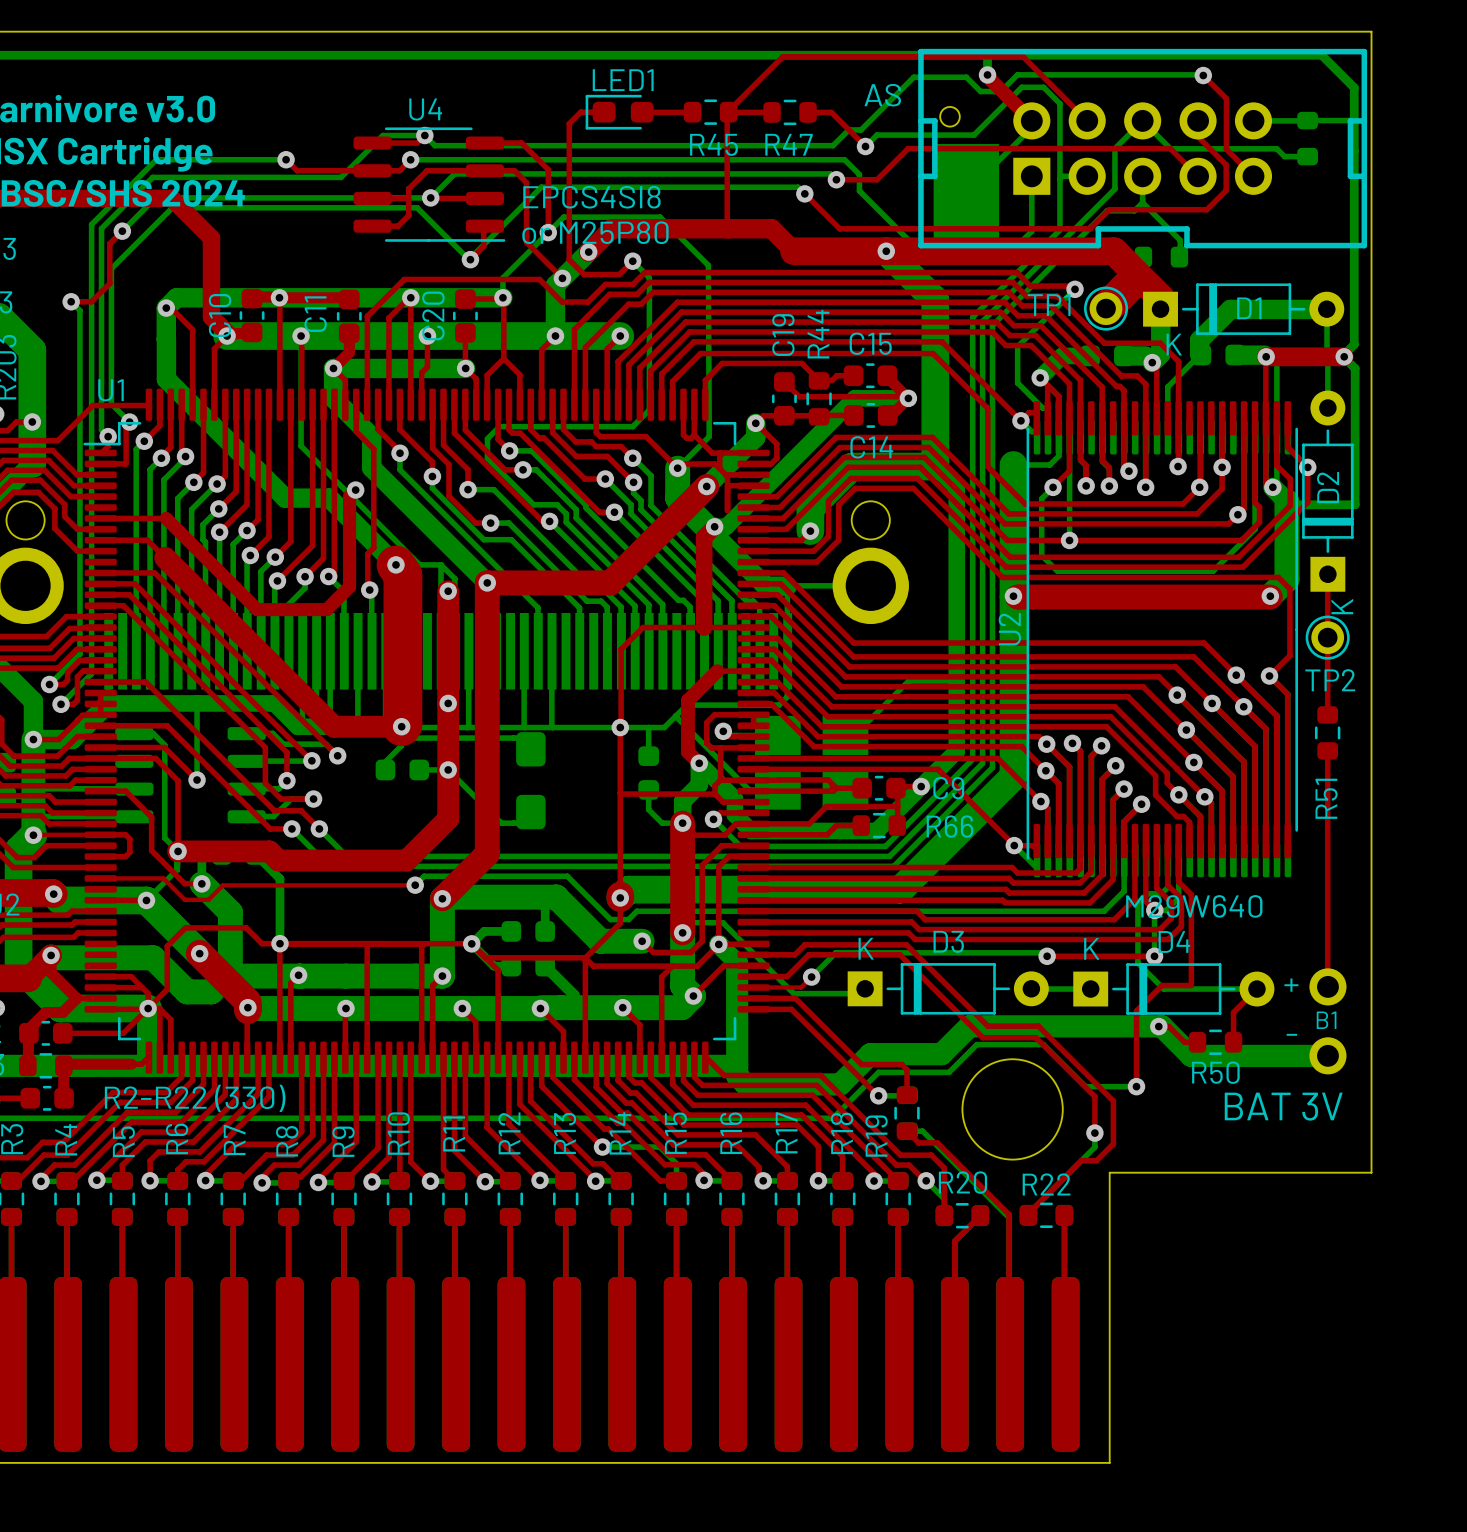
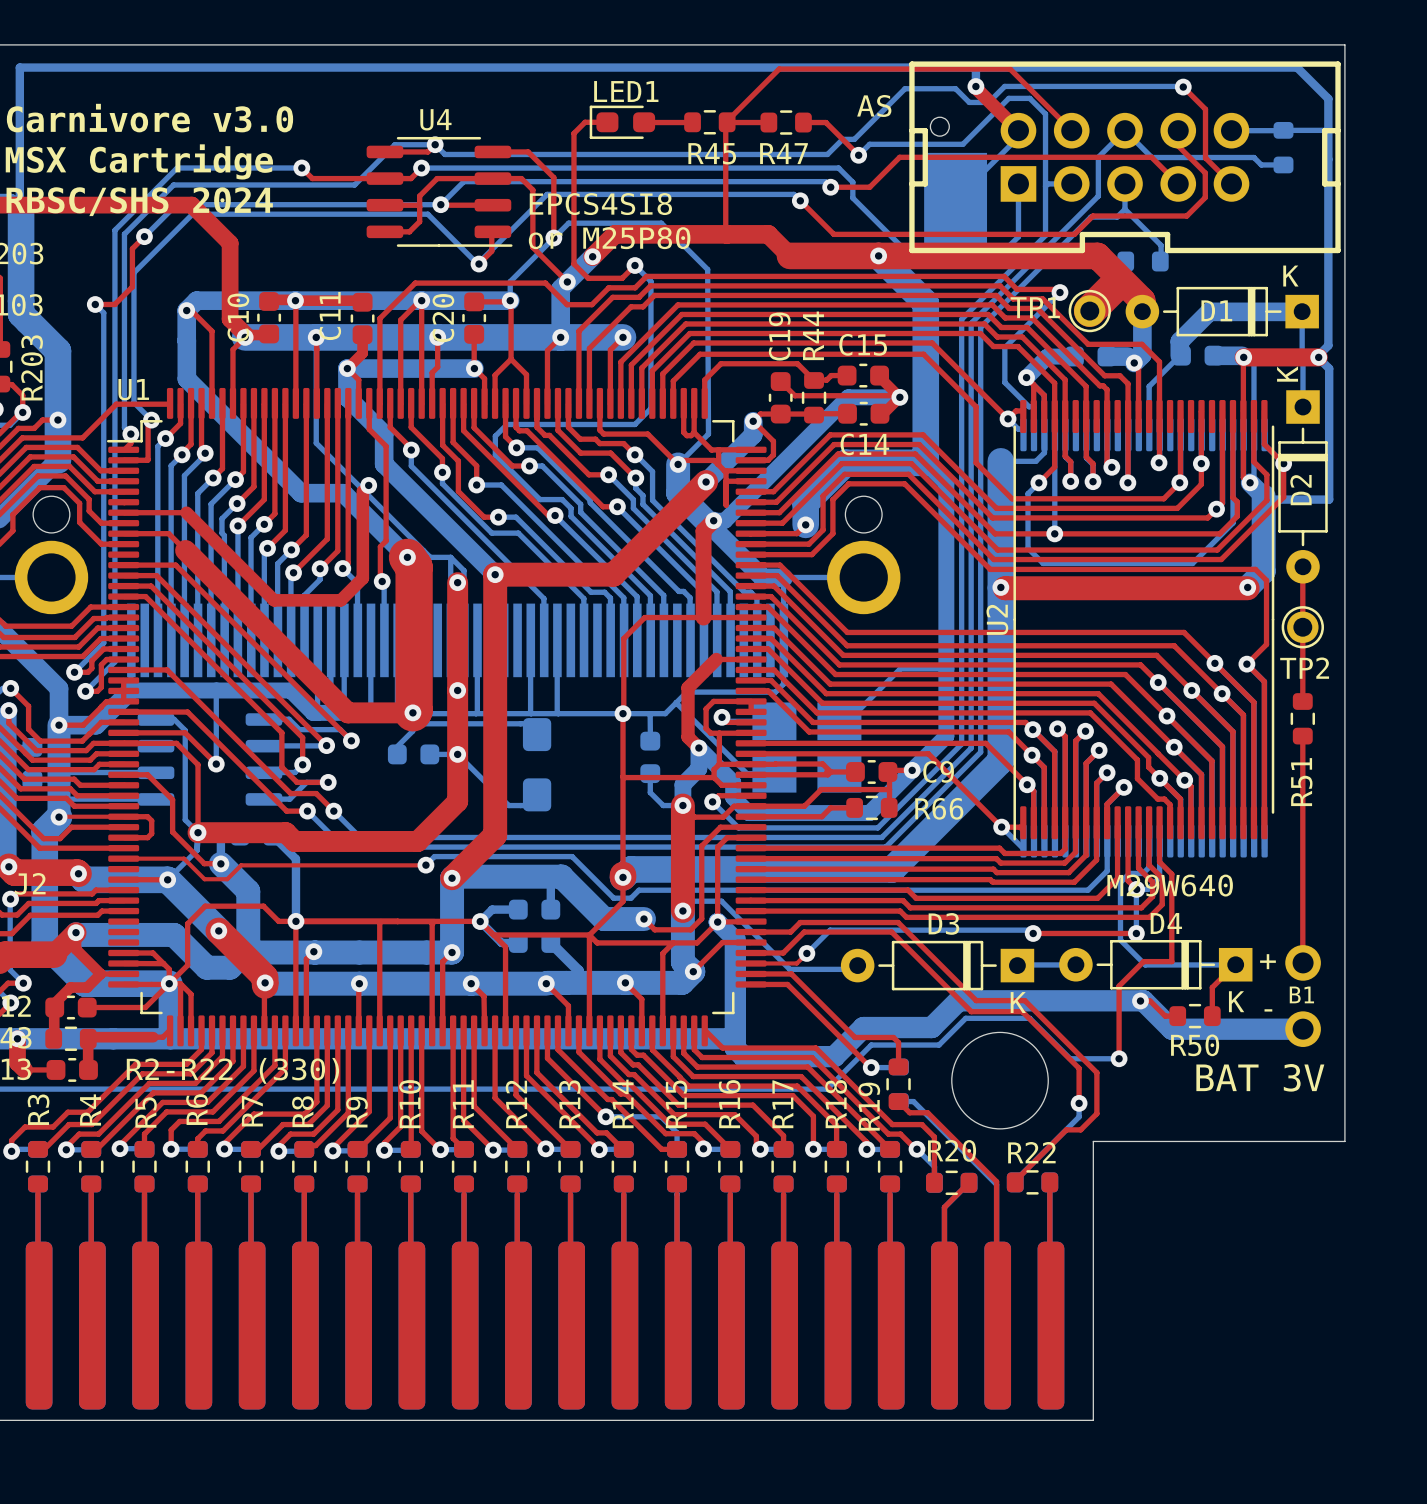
D1 rotation: 0° (1243, 309) -> 180° (1222, 311)
D2 rotation: 0° (1327, 491) -> 180° (1303, 486)
D3 rotation: 0° (948, 988) -> 180° (937, 965)
D4 rotation: 0° (1173, 989) -> 180° (1155, 964)

